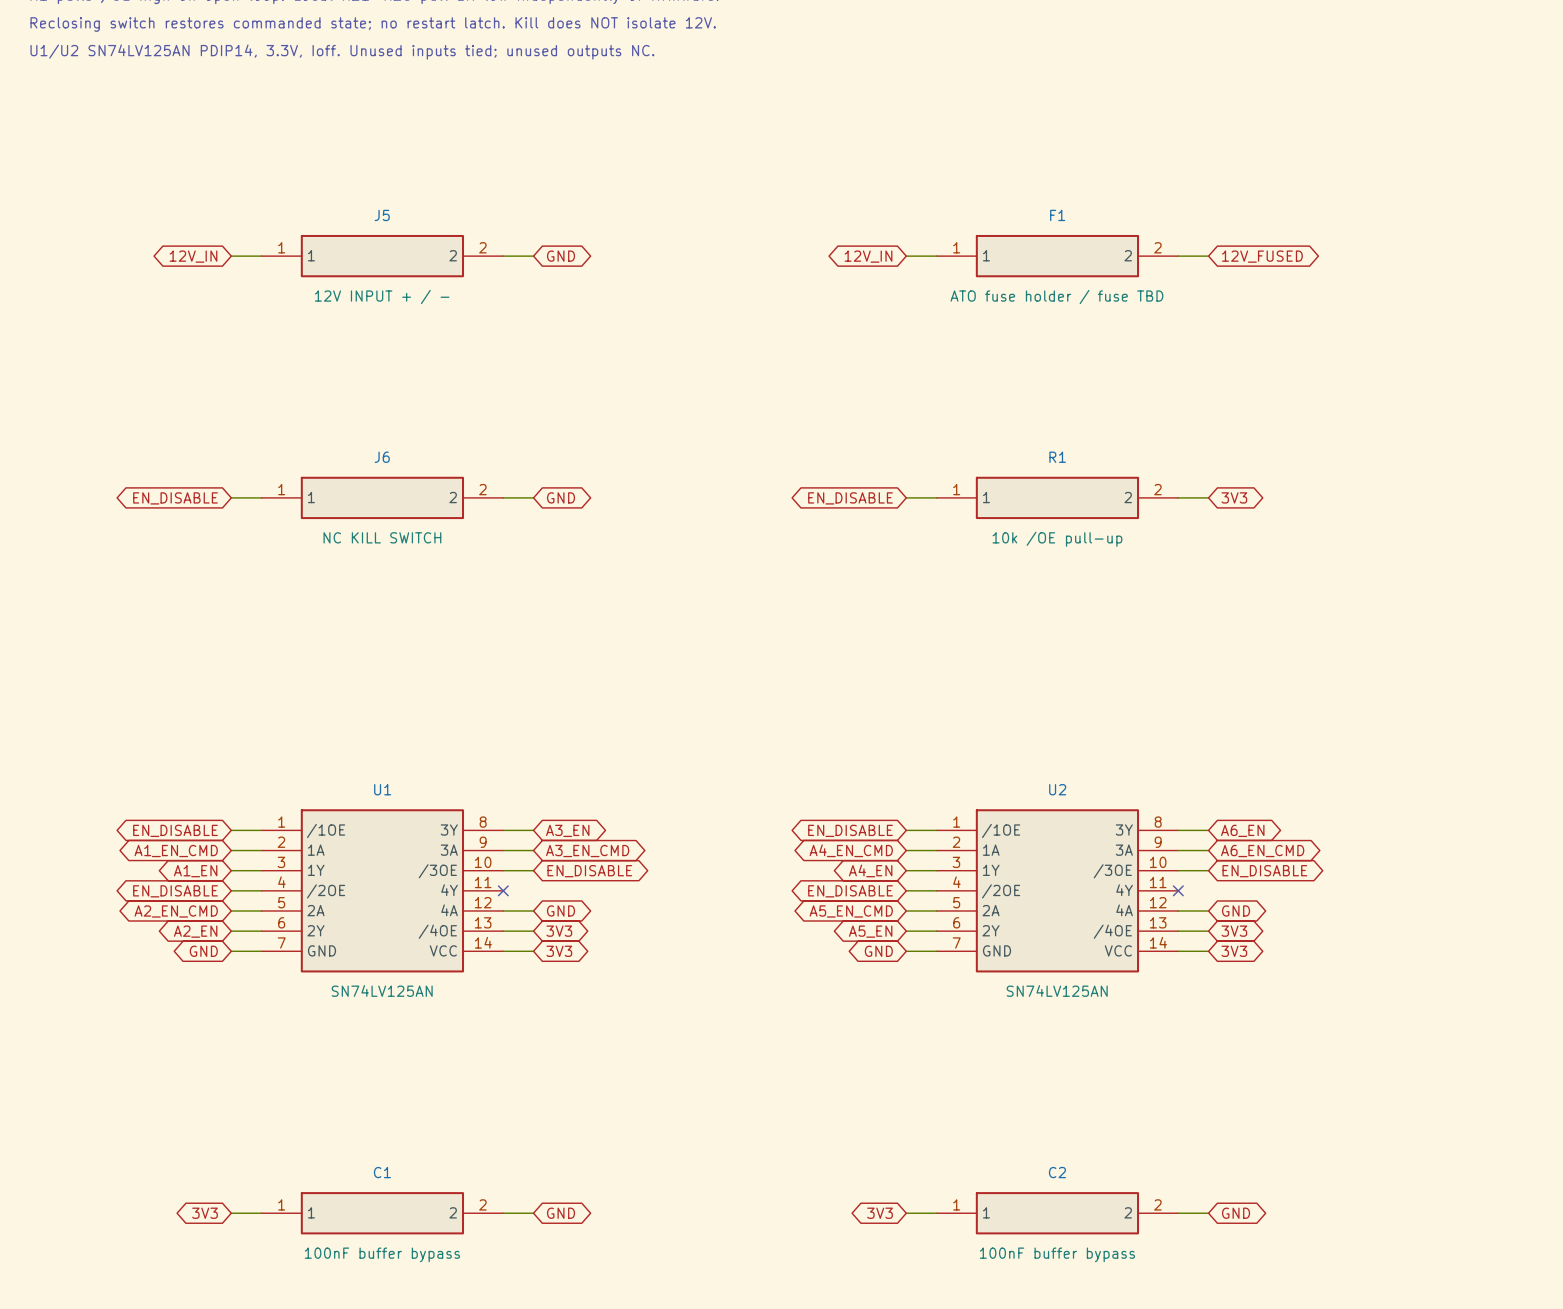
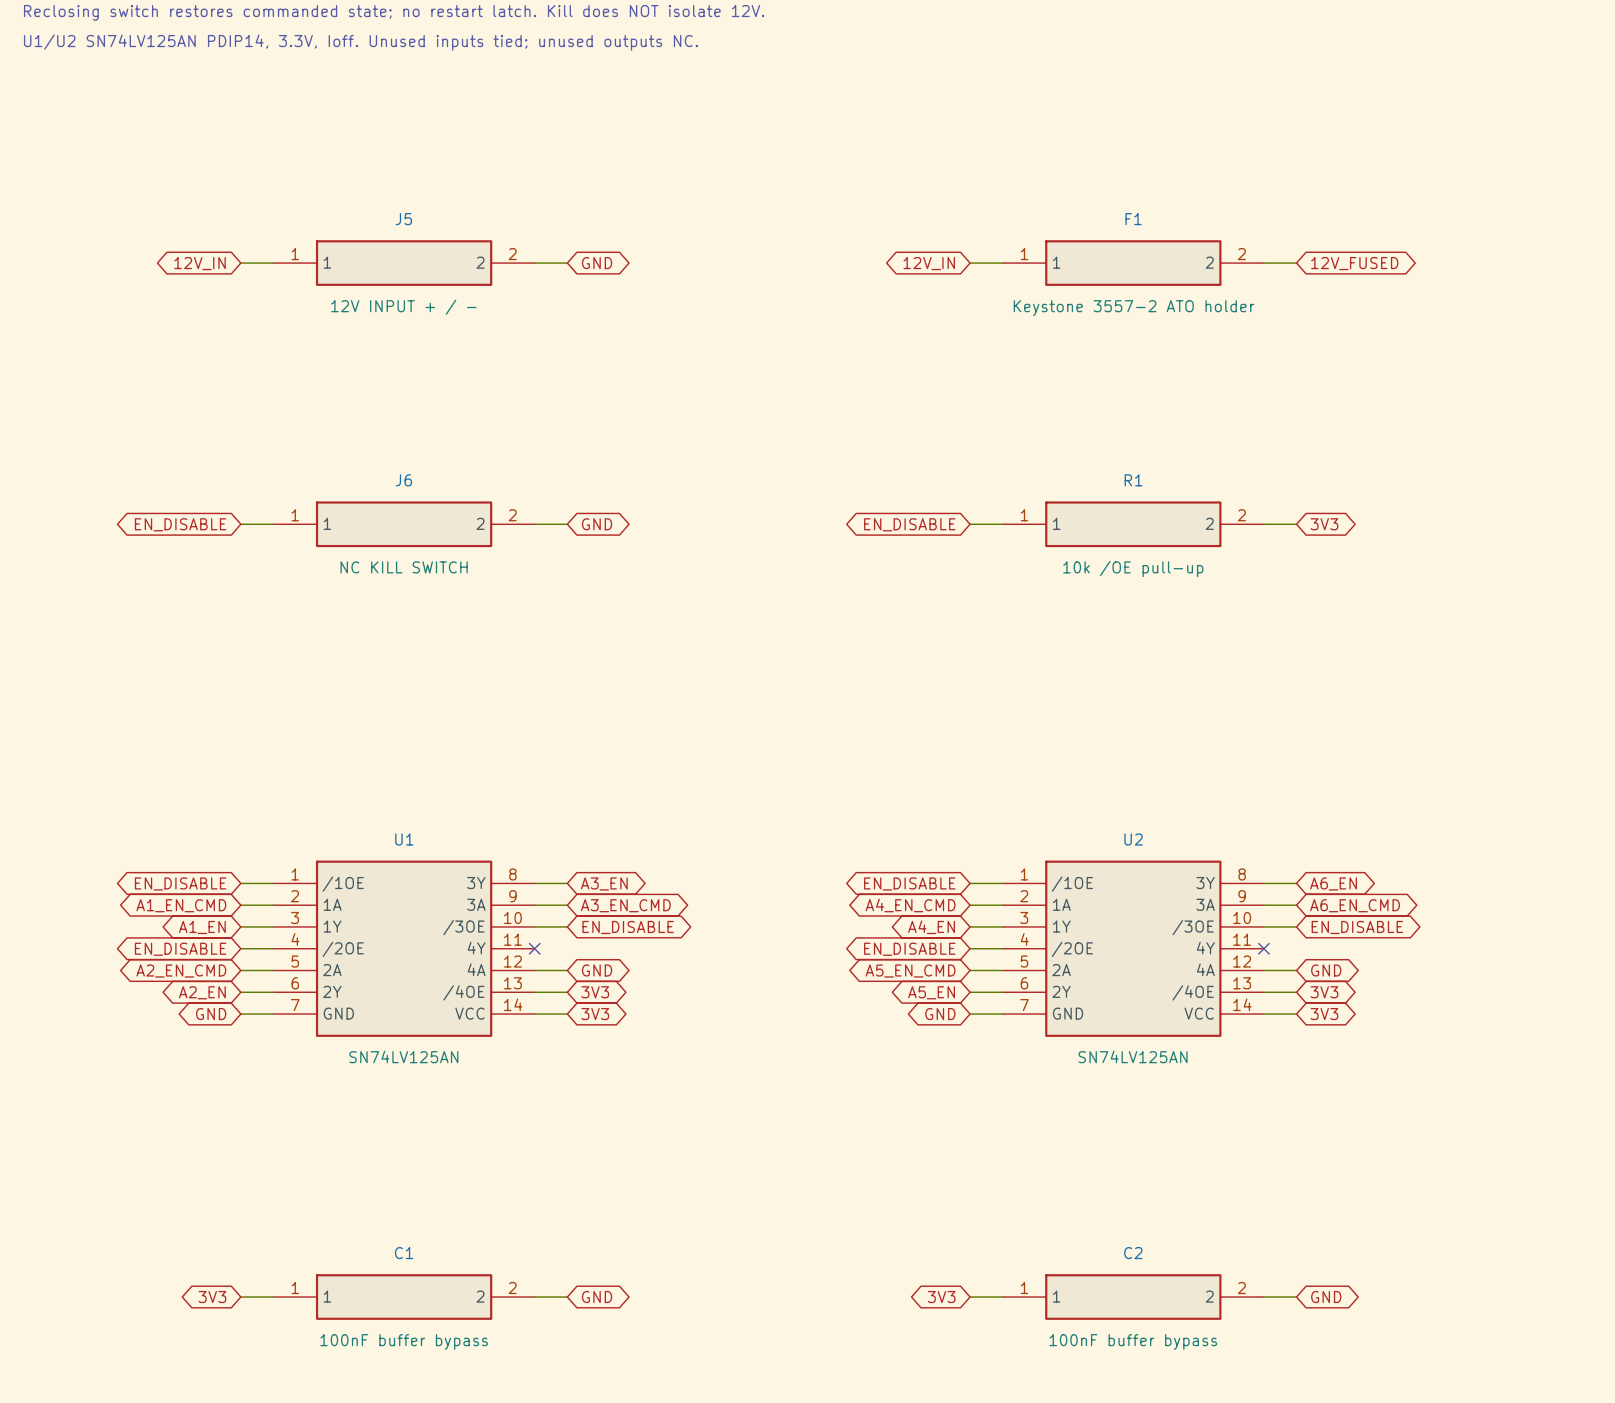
F1 value: ATO fuse holder / fuse TBD (1056, 297) -> Keystone 3557-2 ATO holder (1134, 308)

